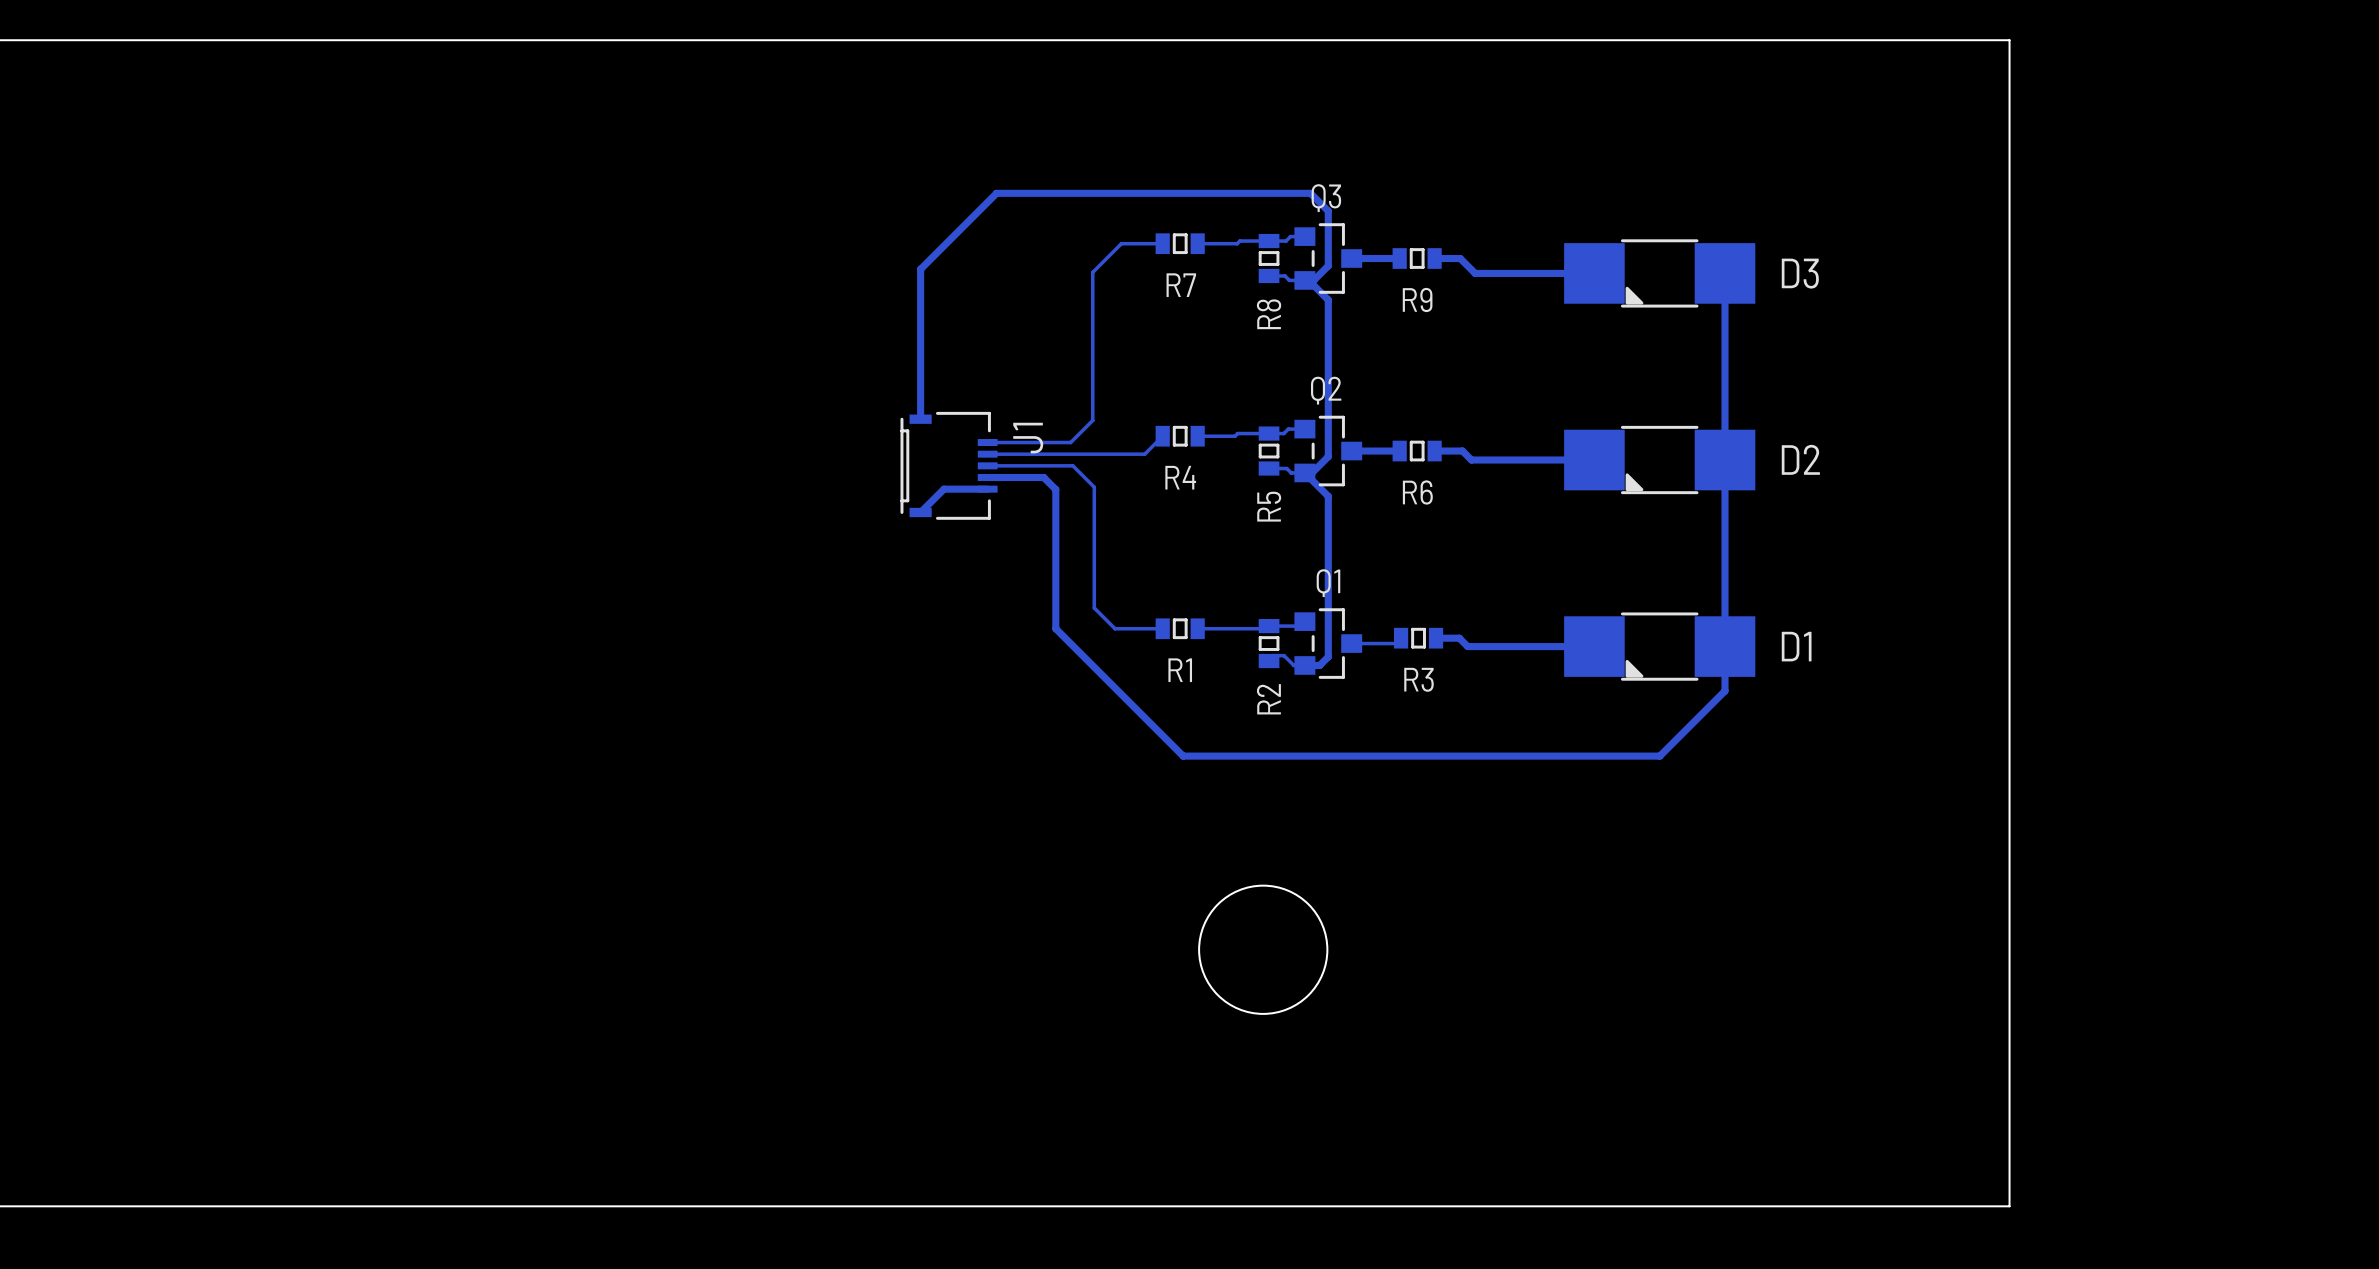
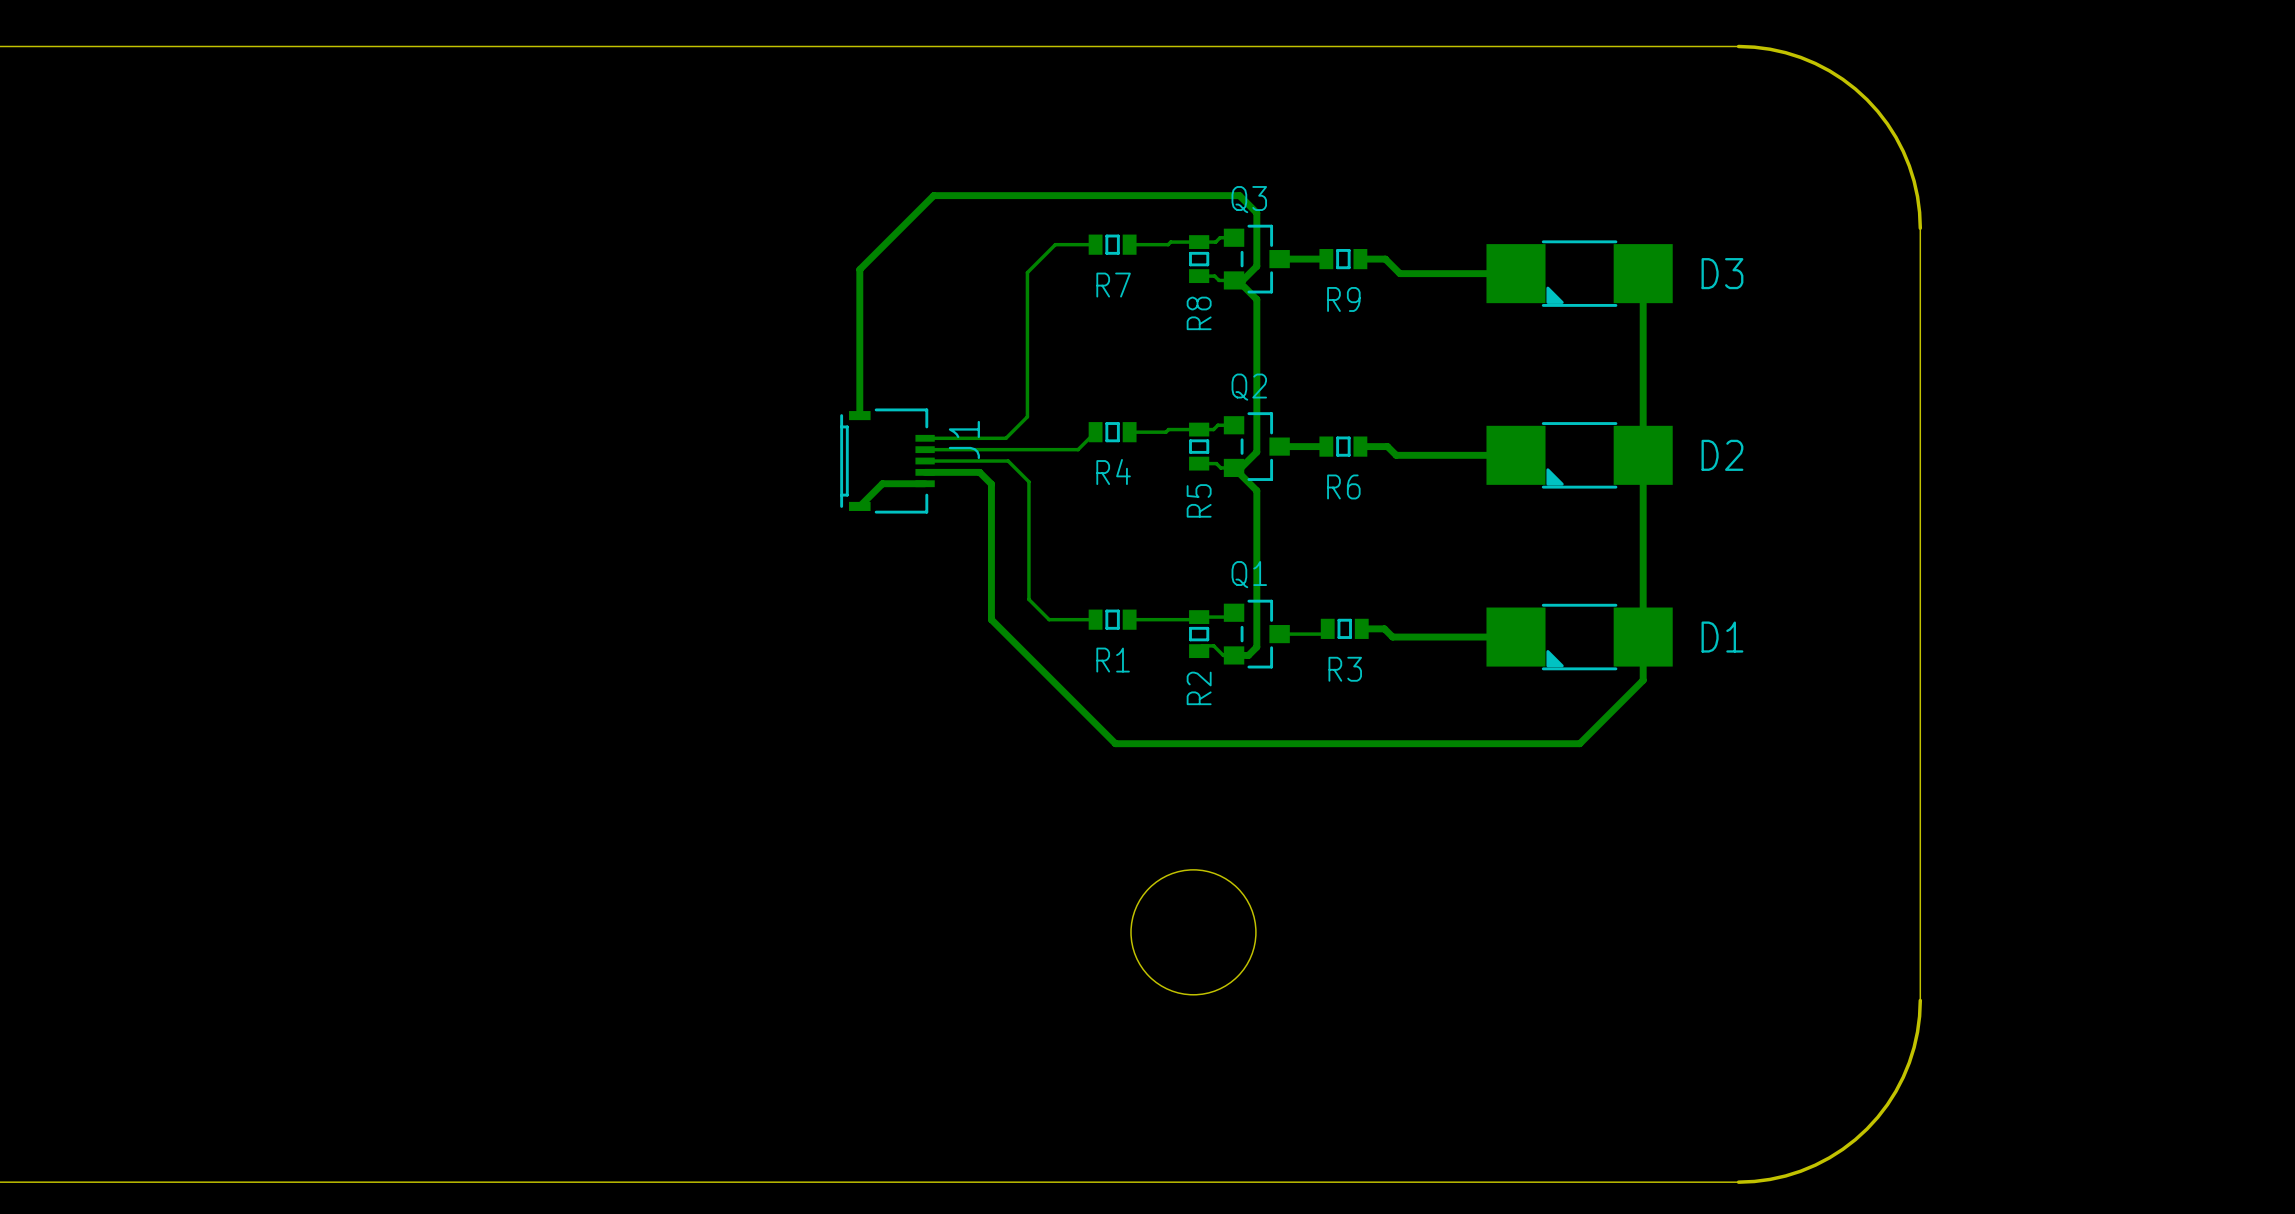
board edge: (1822, 40) (2009, 40) (2009, 226) -> (1738, 46) (1770, 49) (1815, 63) (1842, 79) (1867, 99) (1887, 123) (1903, 151) (1917, 196) (1920, 228)
board edge: (2009, 1019) (2009, 1206) (1822, 1206) -> (1920, 1000) (1917, 1032) (1903, 1077) (1887, 1104) (1867, 1128) (1842, 1149) (1815, 1165) (1770, 1179) (1738, 1182)

